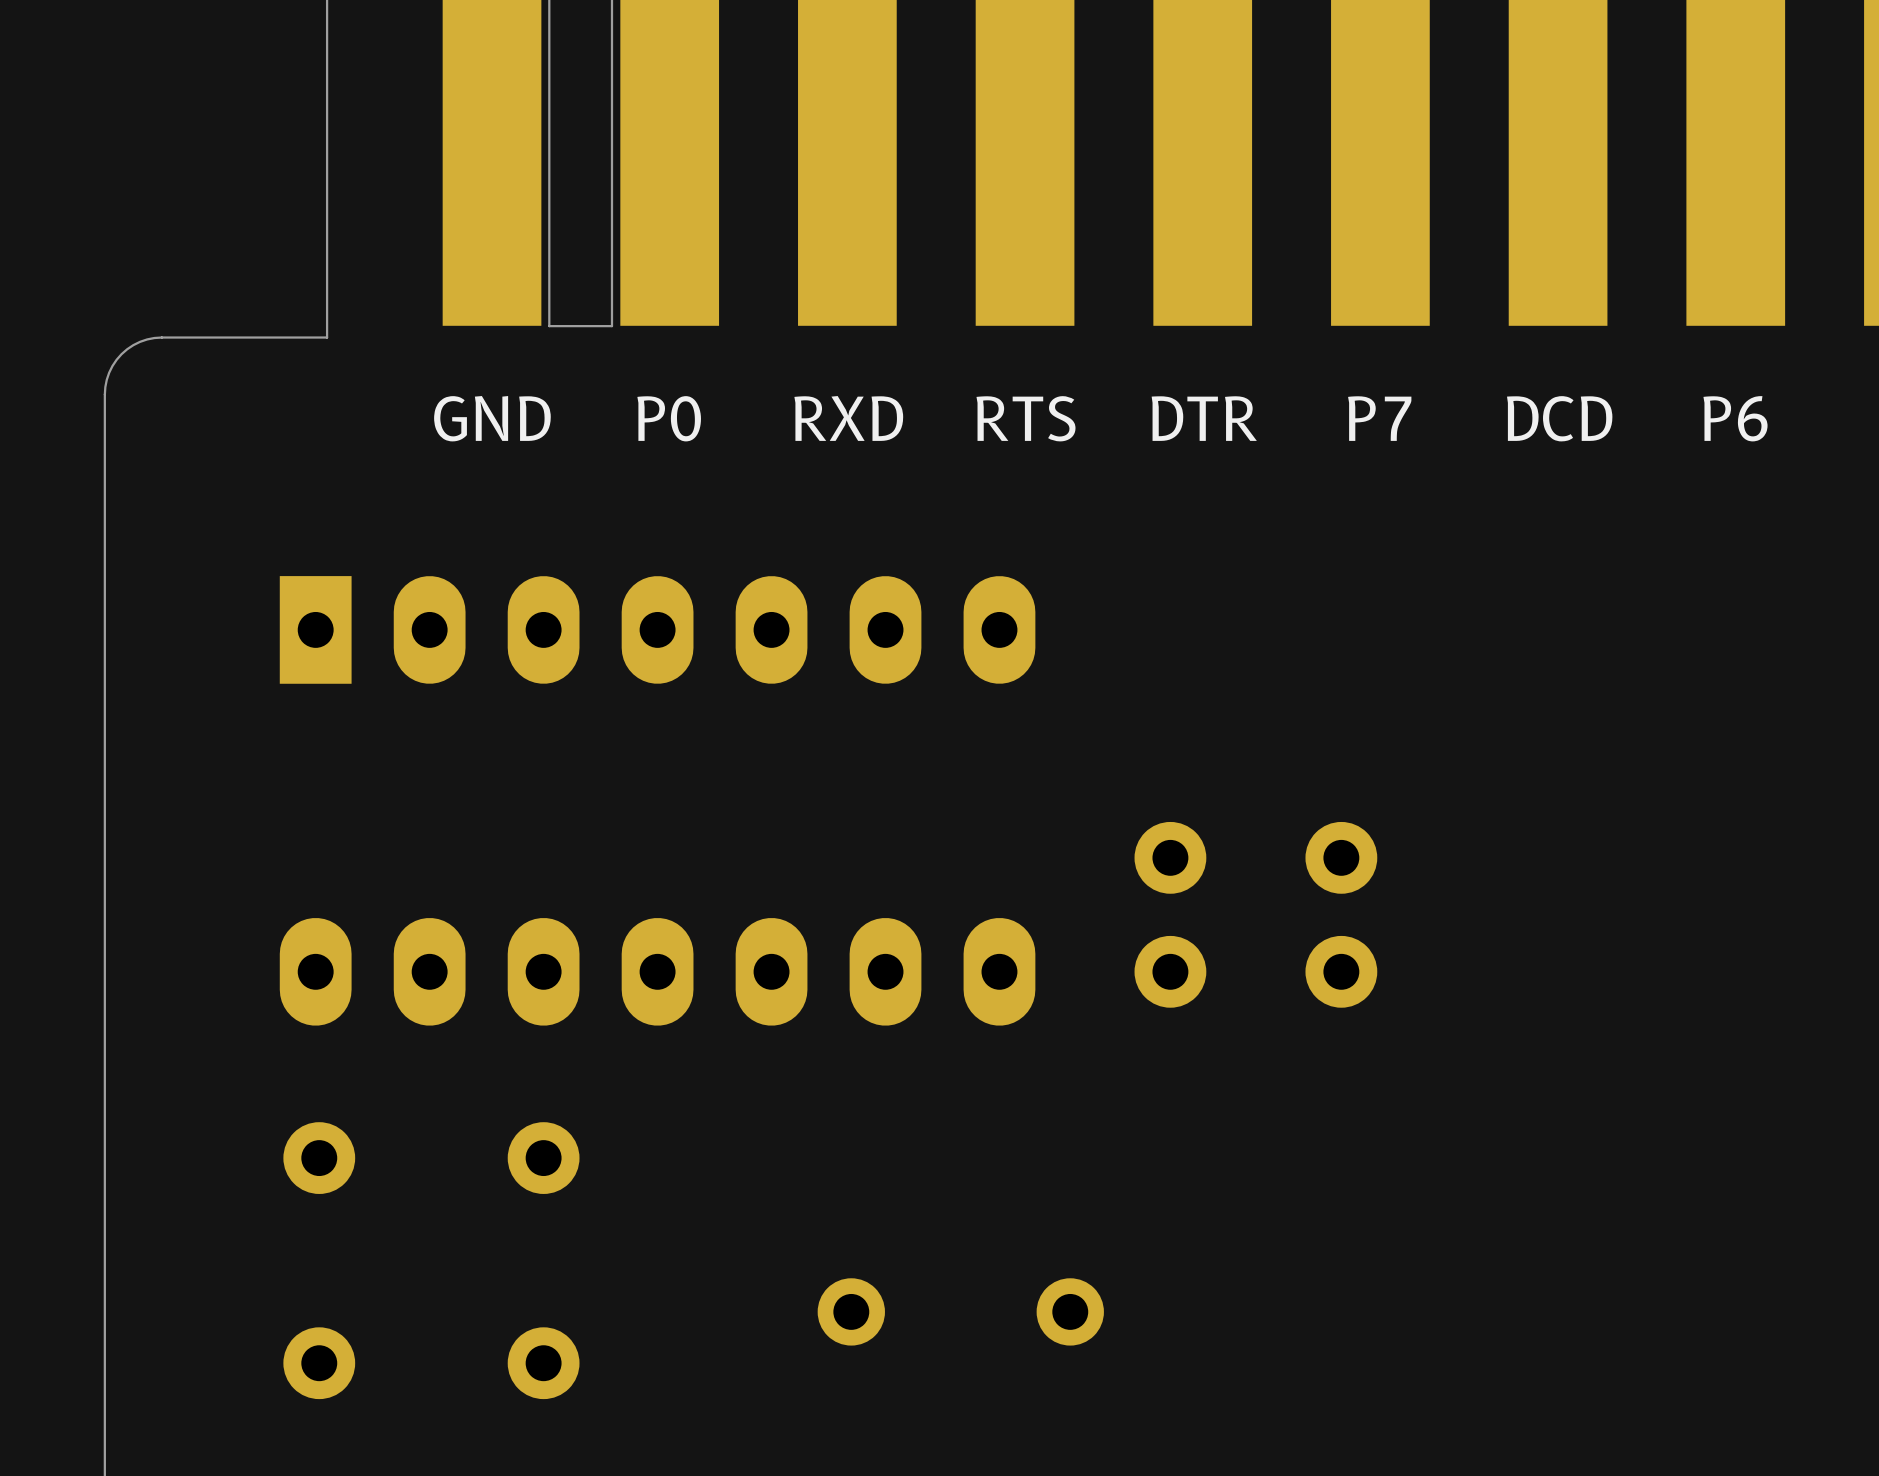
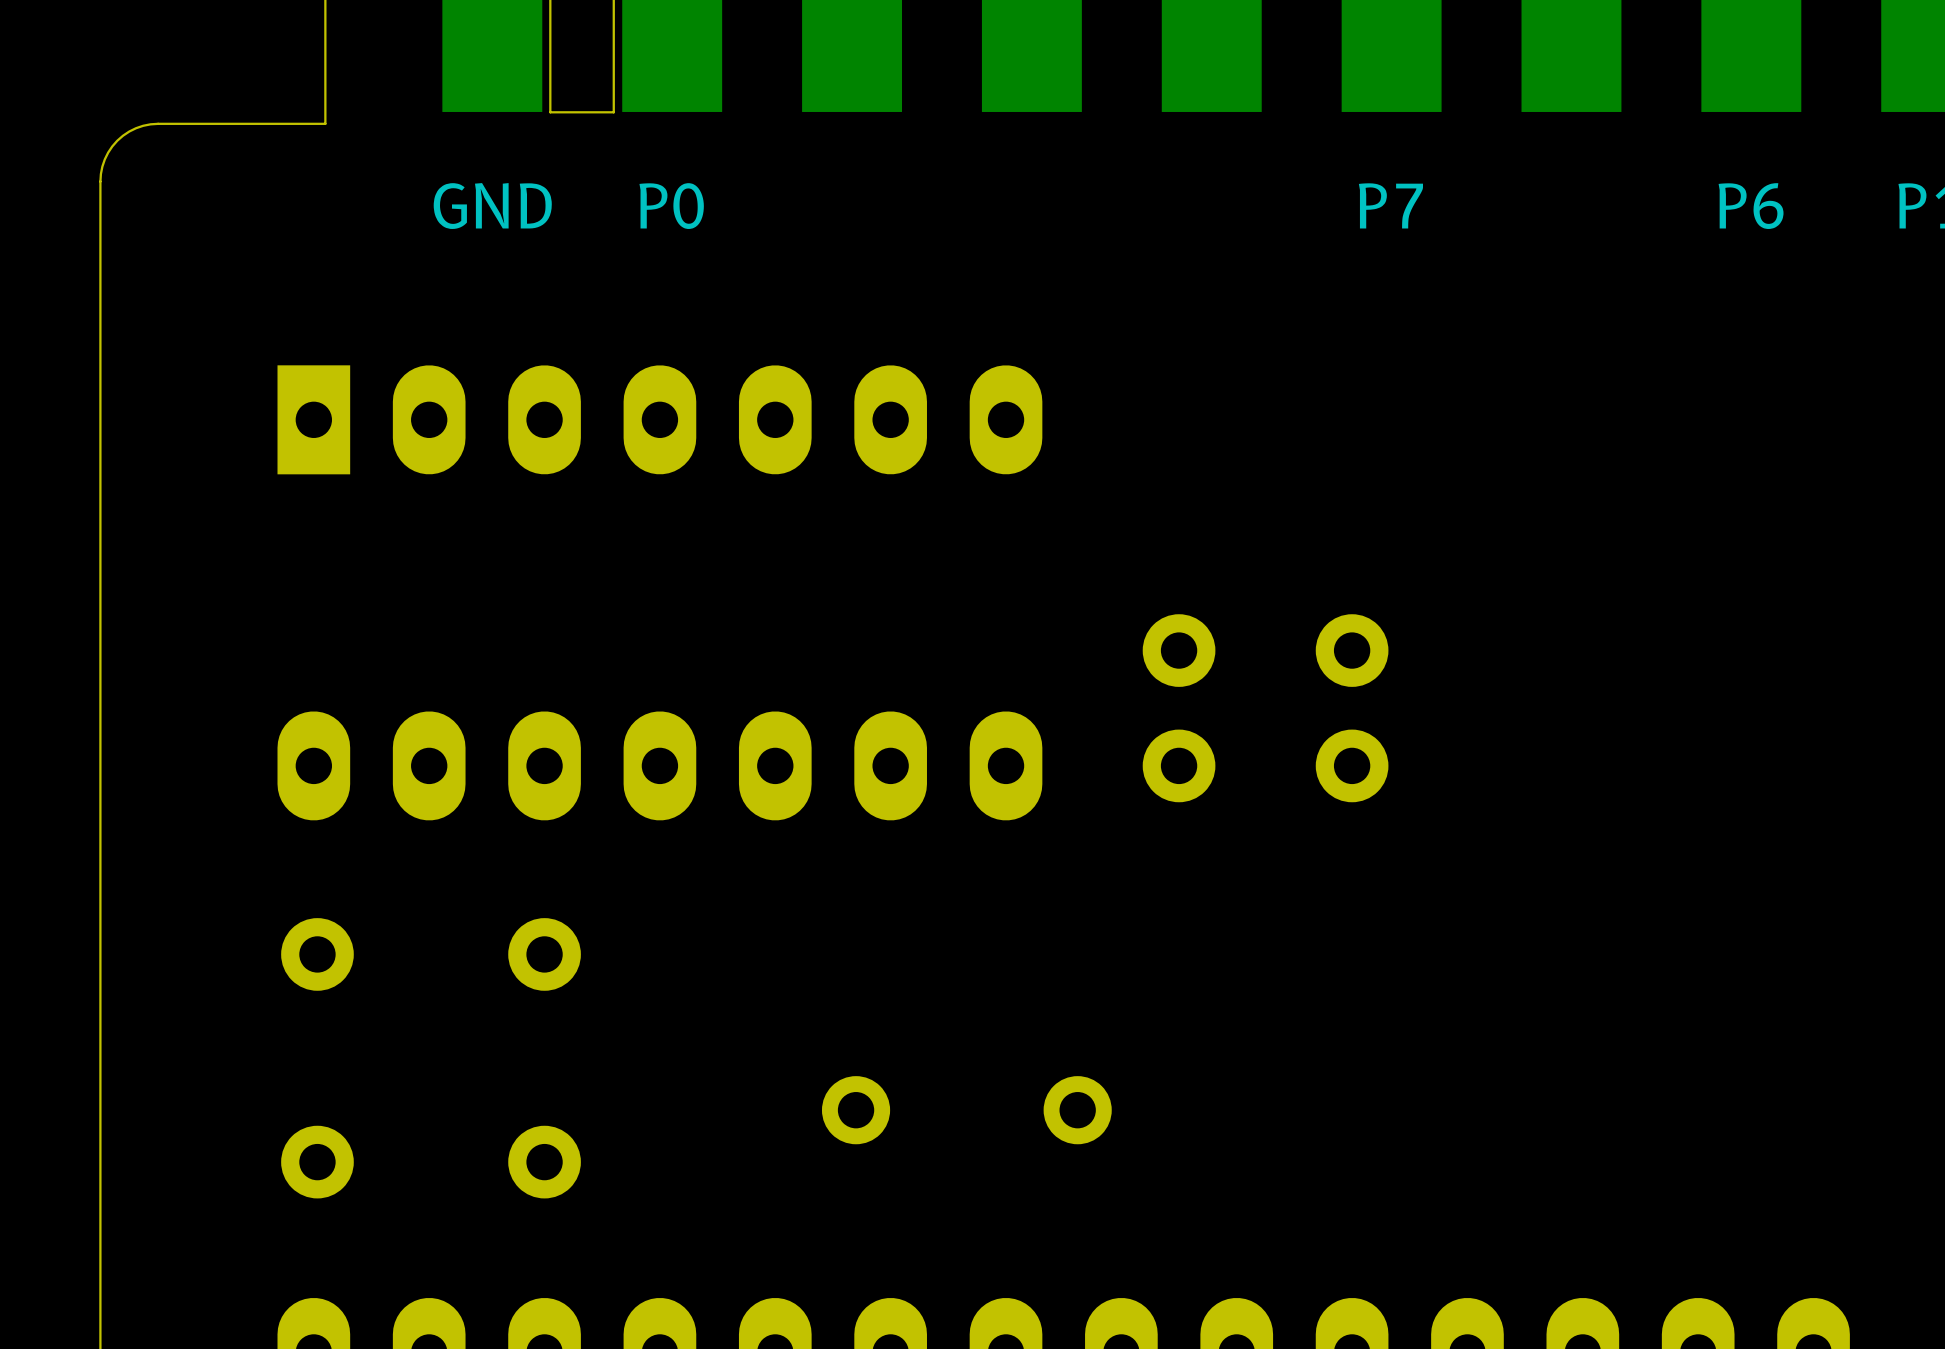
text: RXD (848, 418) -> none
text: RTS (1025, 418) -> none
text: DTR (1204, 418) -> none
text: DCD (1559, 418) -> none

